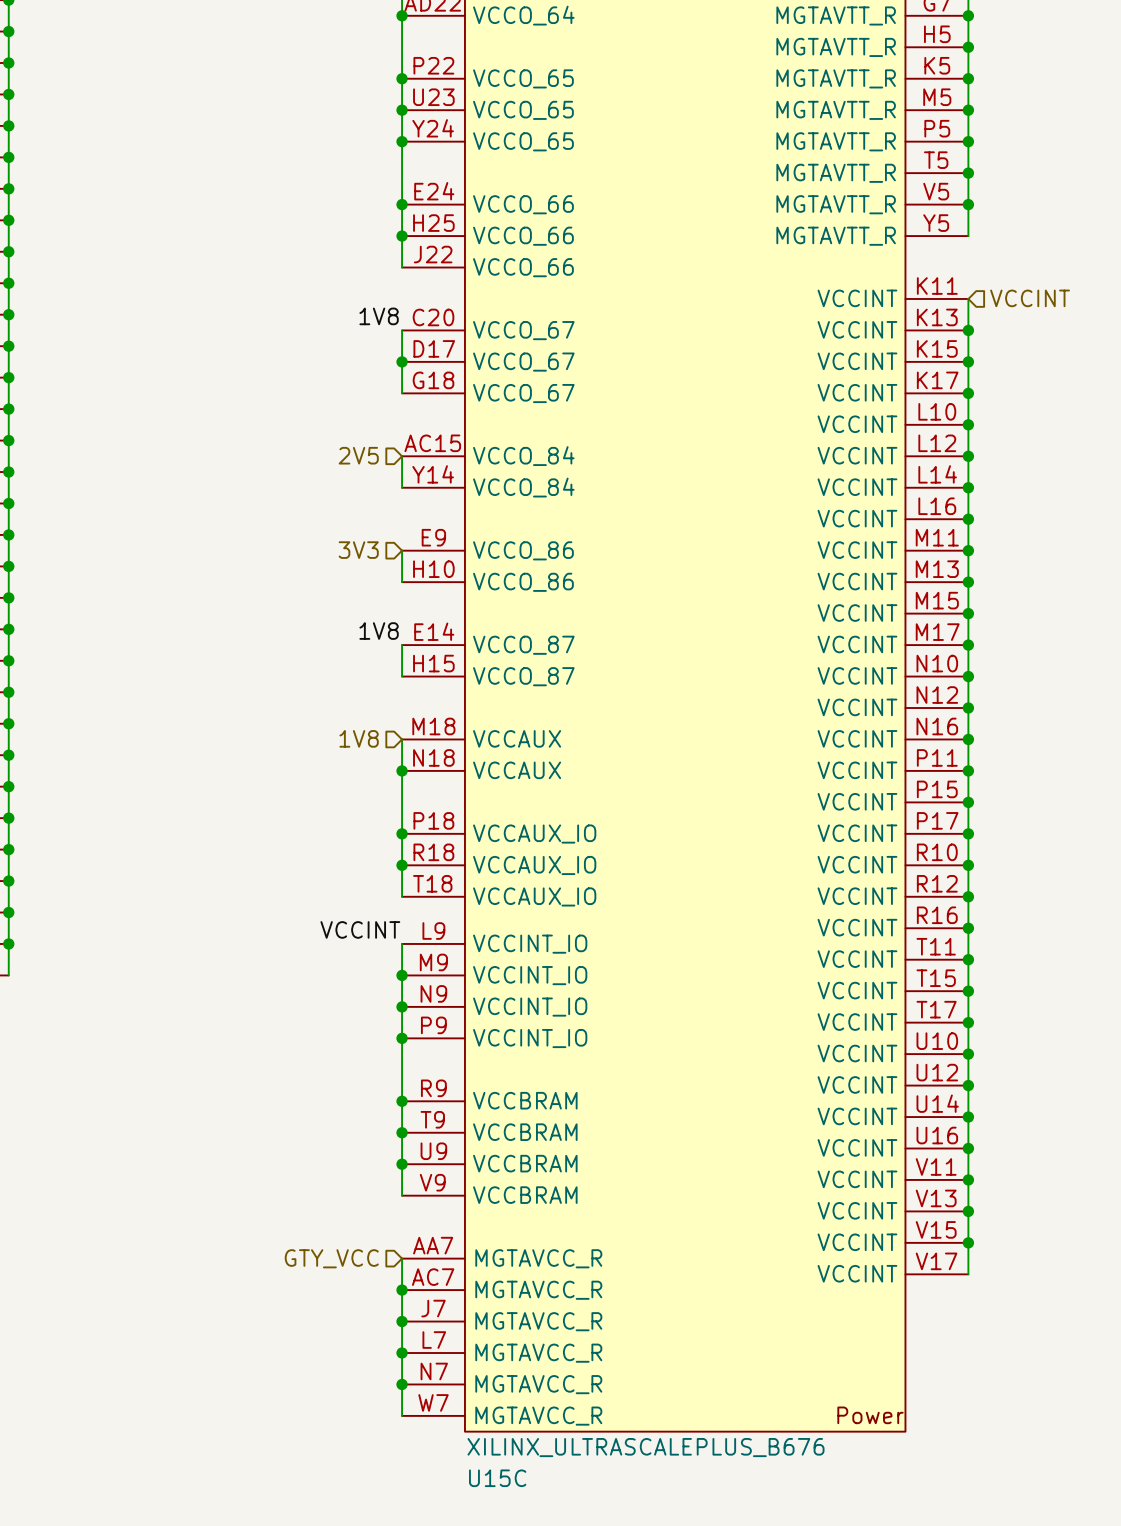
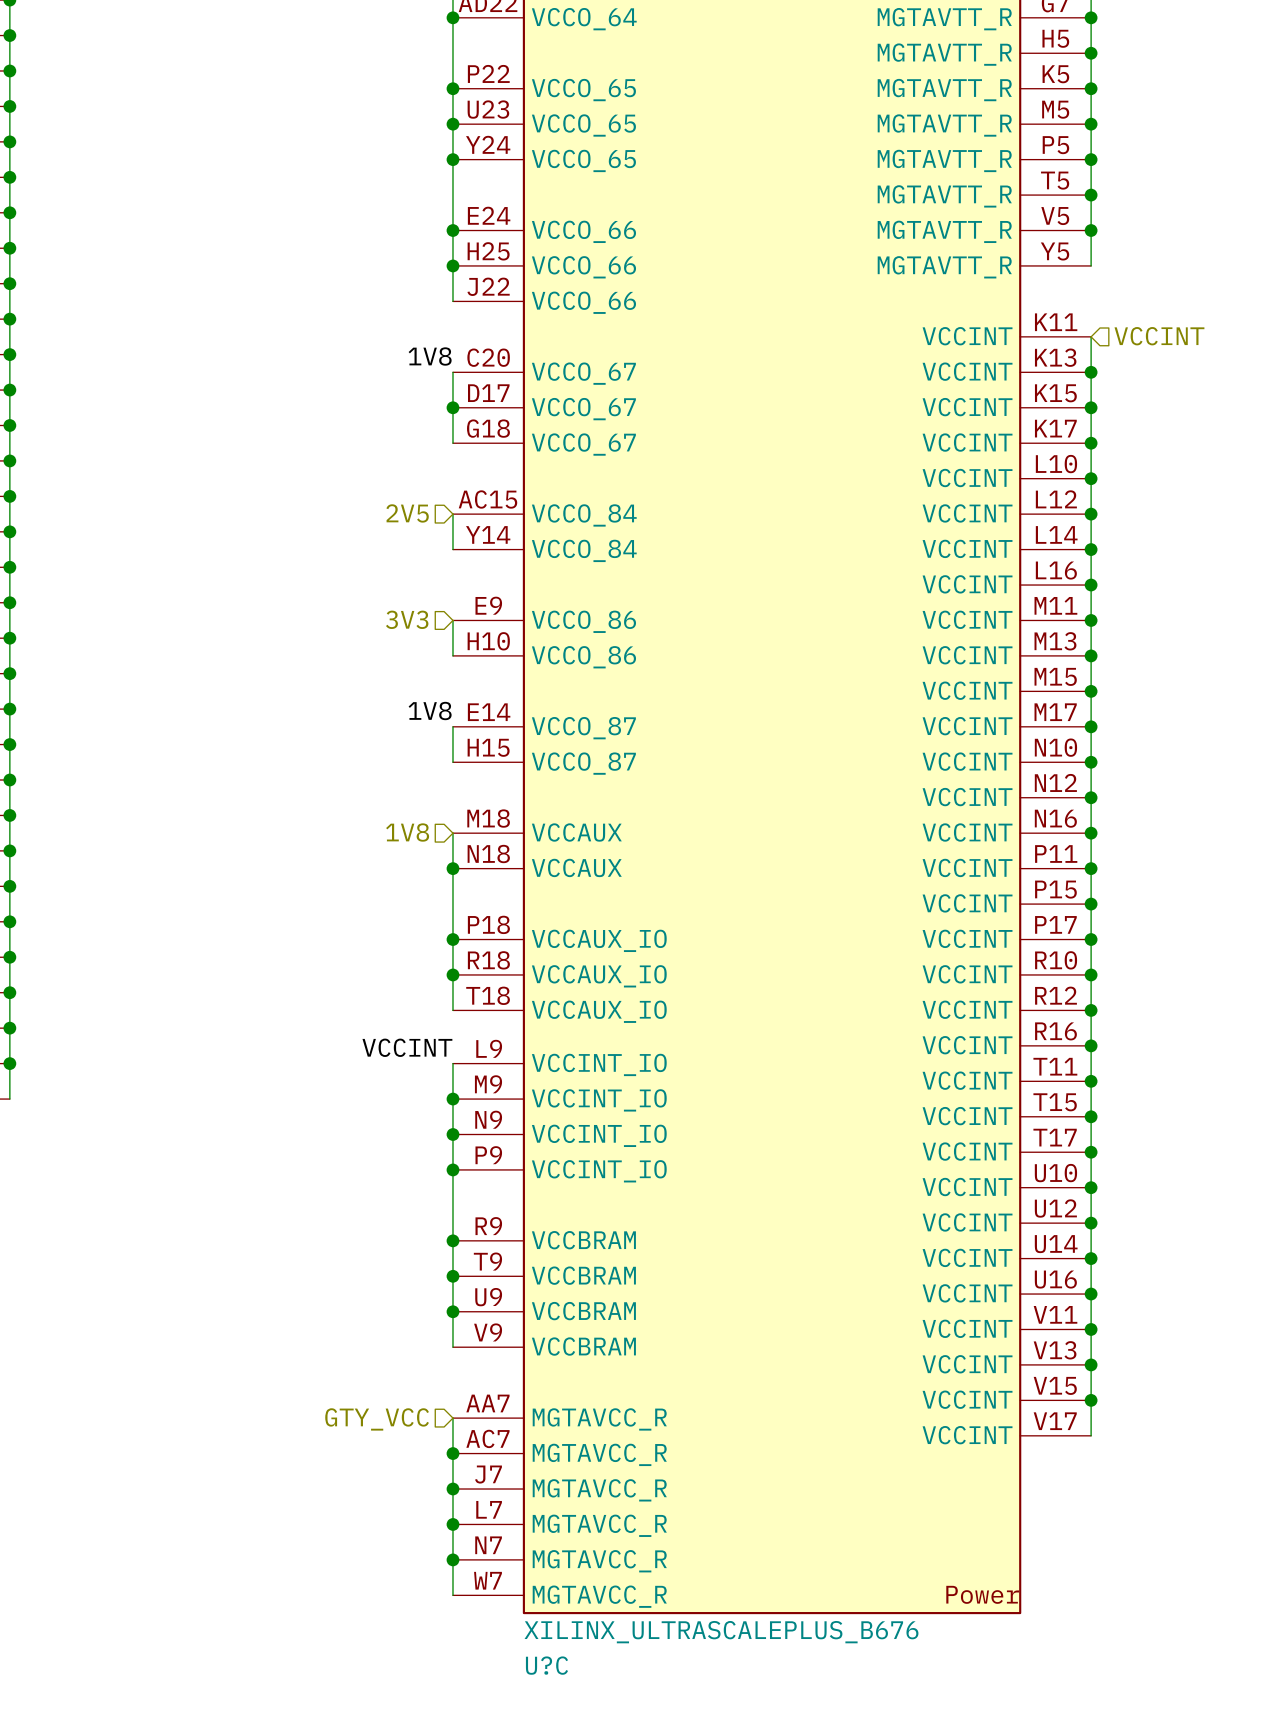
U15C name: U15C (497, 1478) -> U?C (546, 1665)

